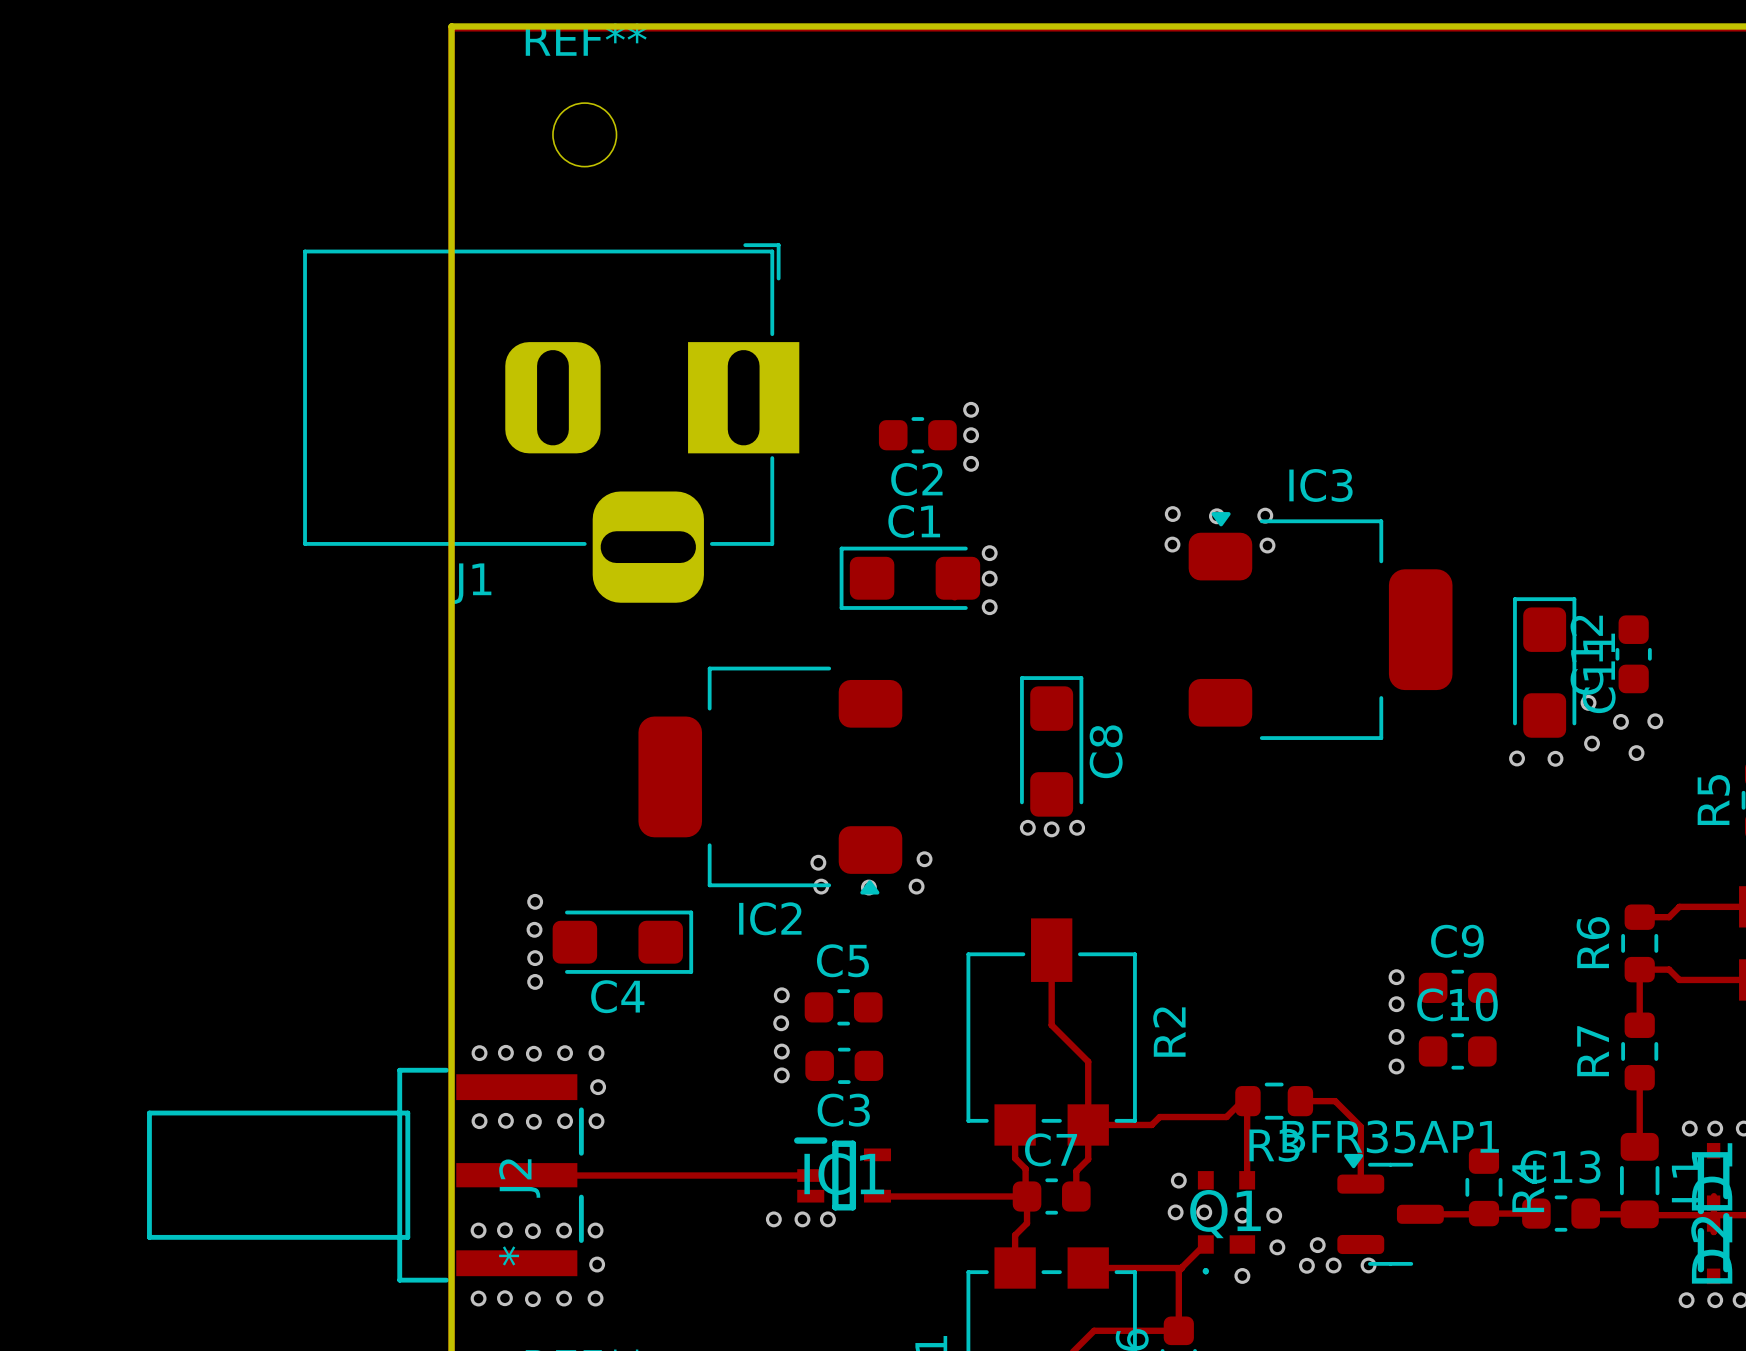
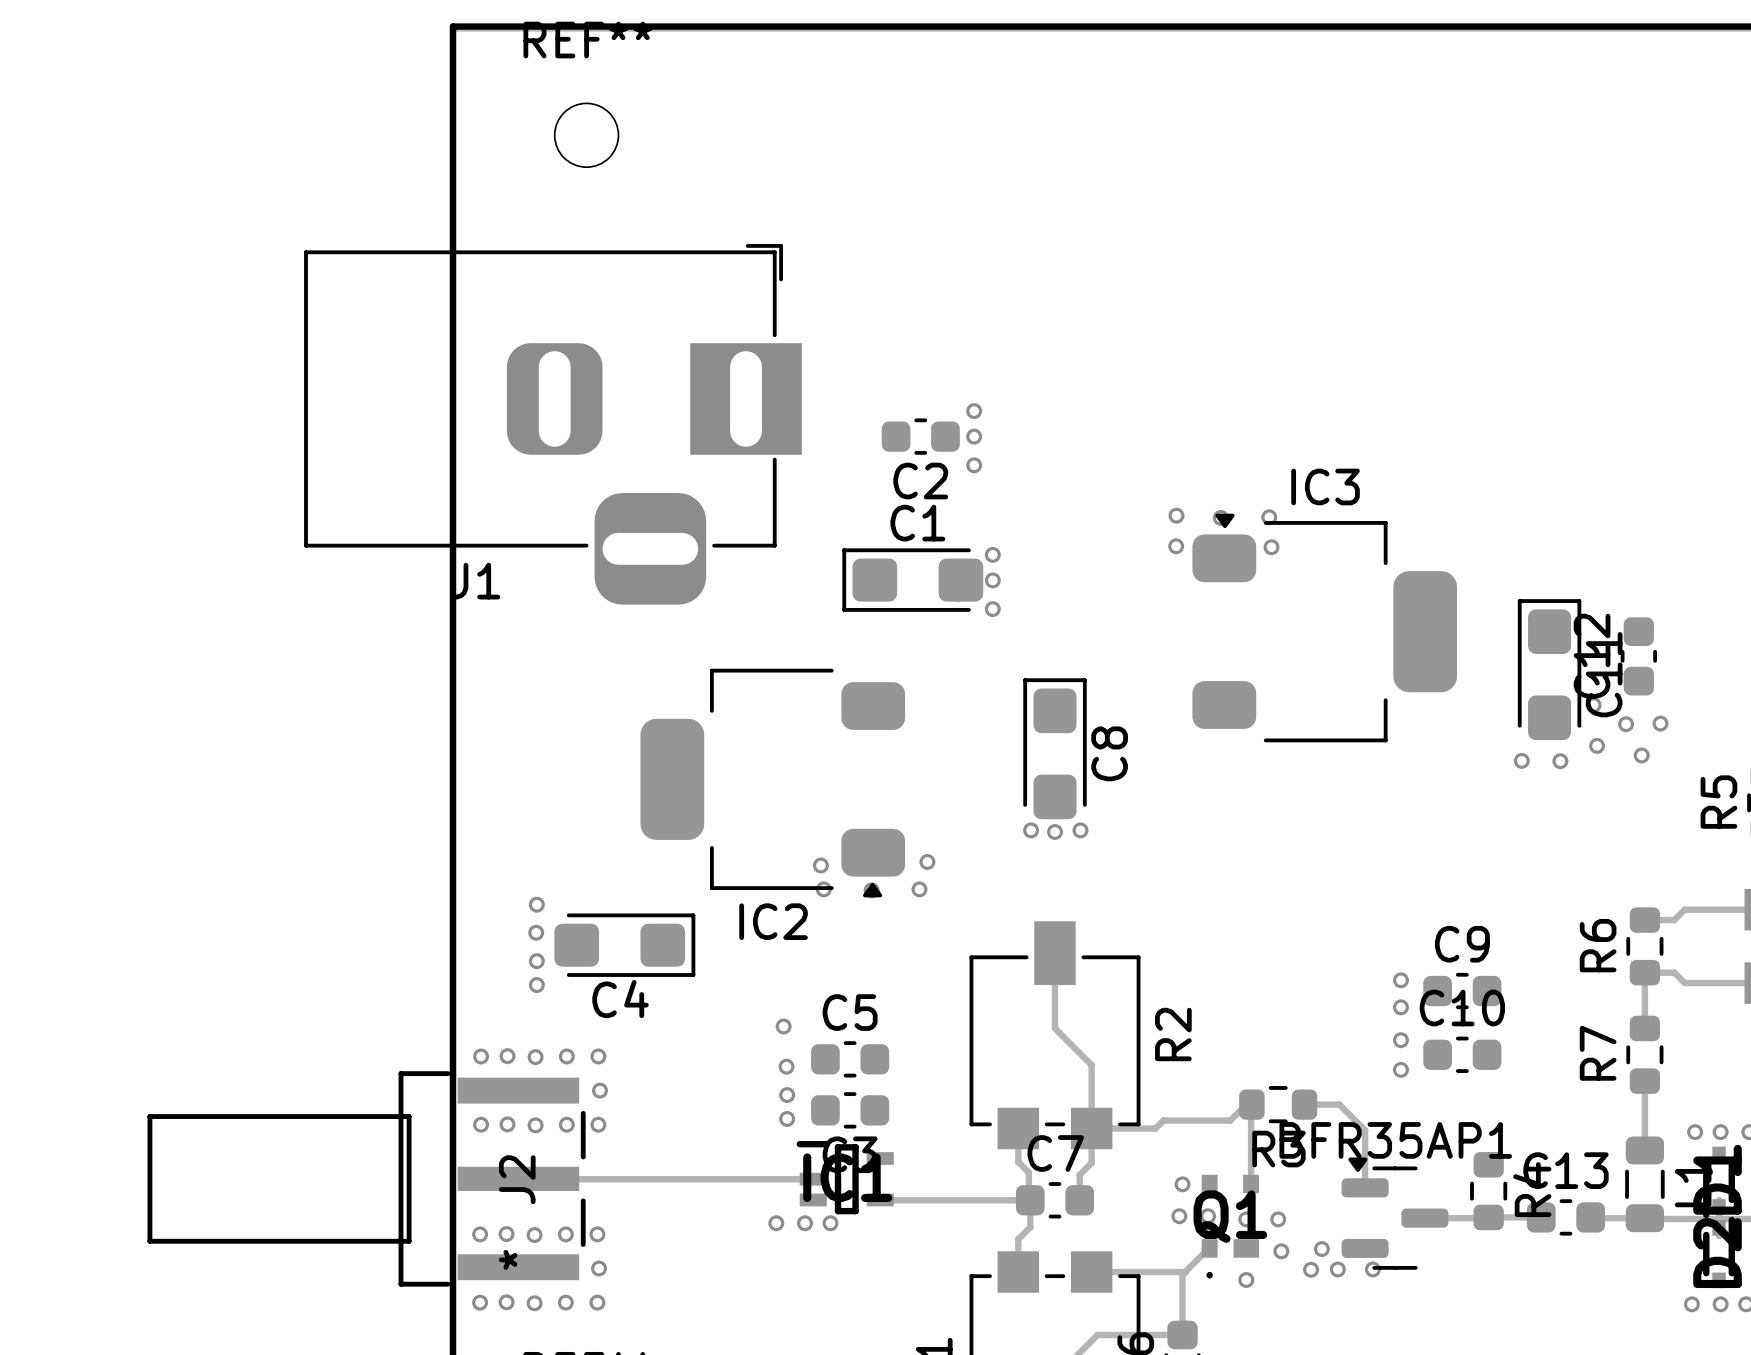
via: (781, 995) -> none
C5 position: (843, 1007) -> (850, 1059)
via: (781, 1051) -> none
via: none -> (786, 1066)
C3 position: (844, 1065) -> (850, 1110)
via: (781, 1075) -> none
via: none -> (787, 1095)
via: none -> (787, 1118)

